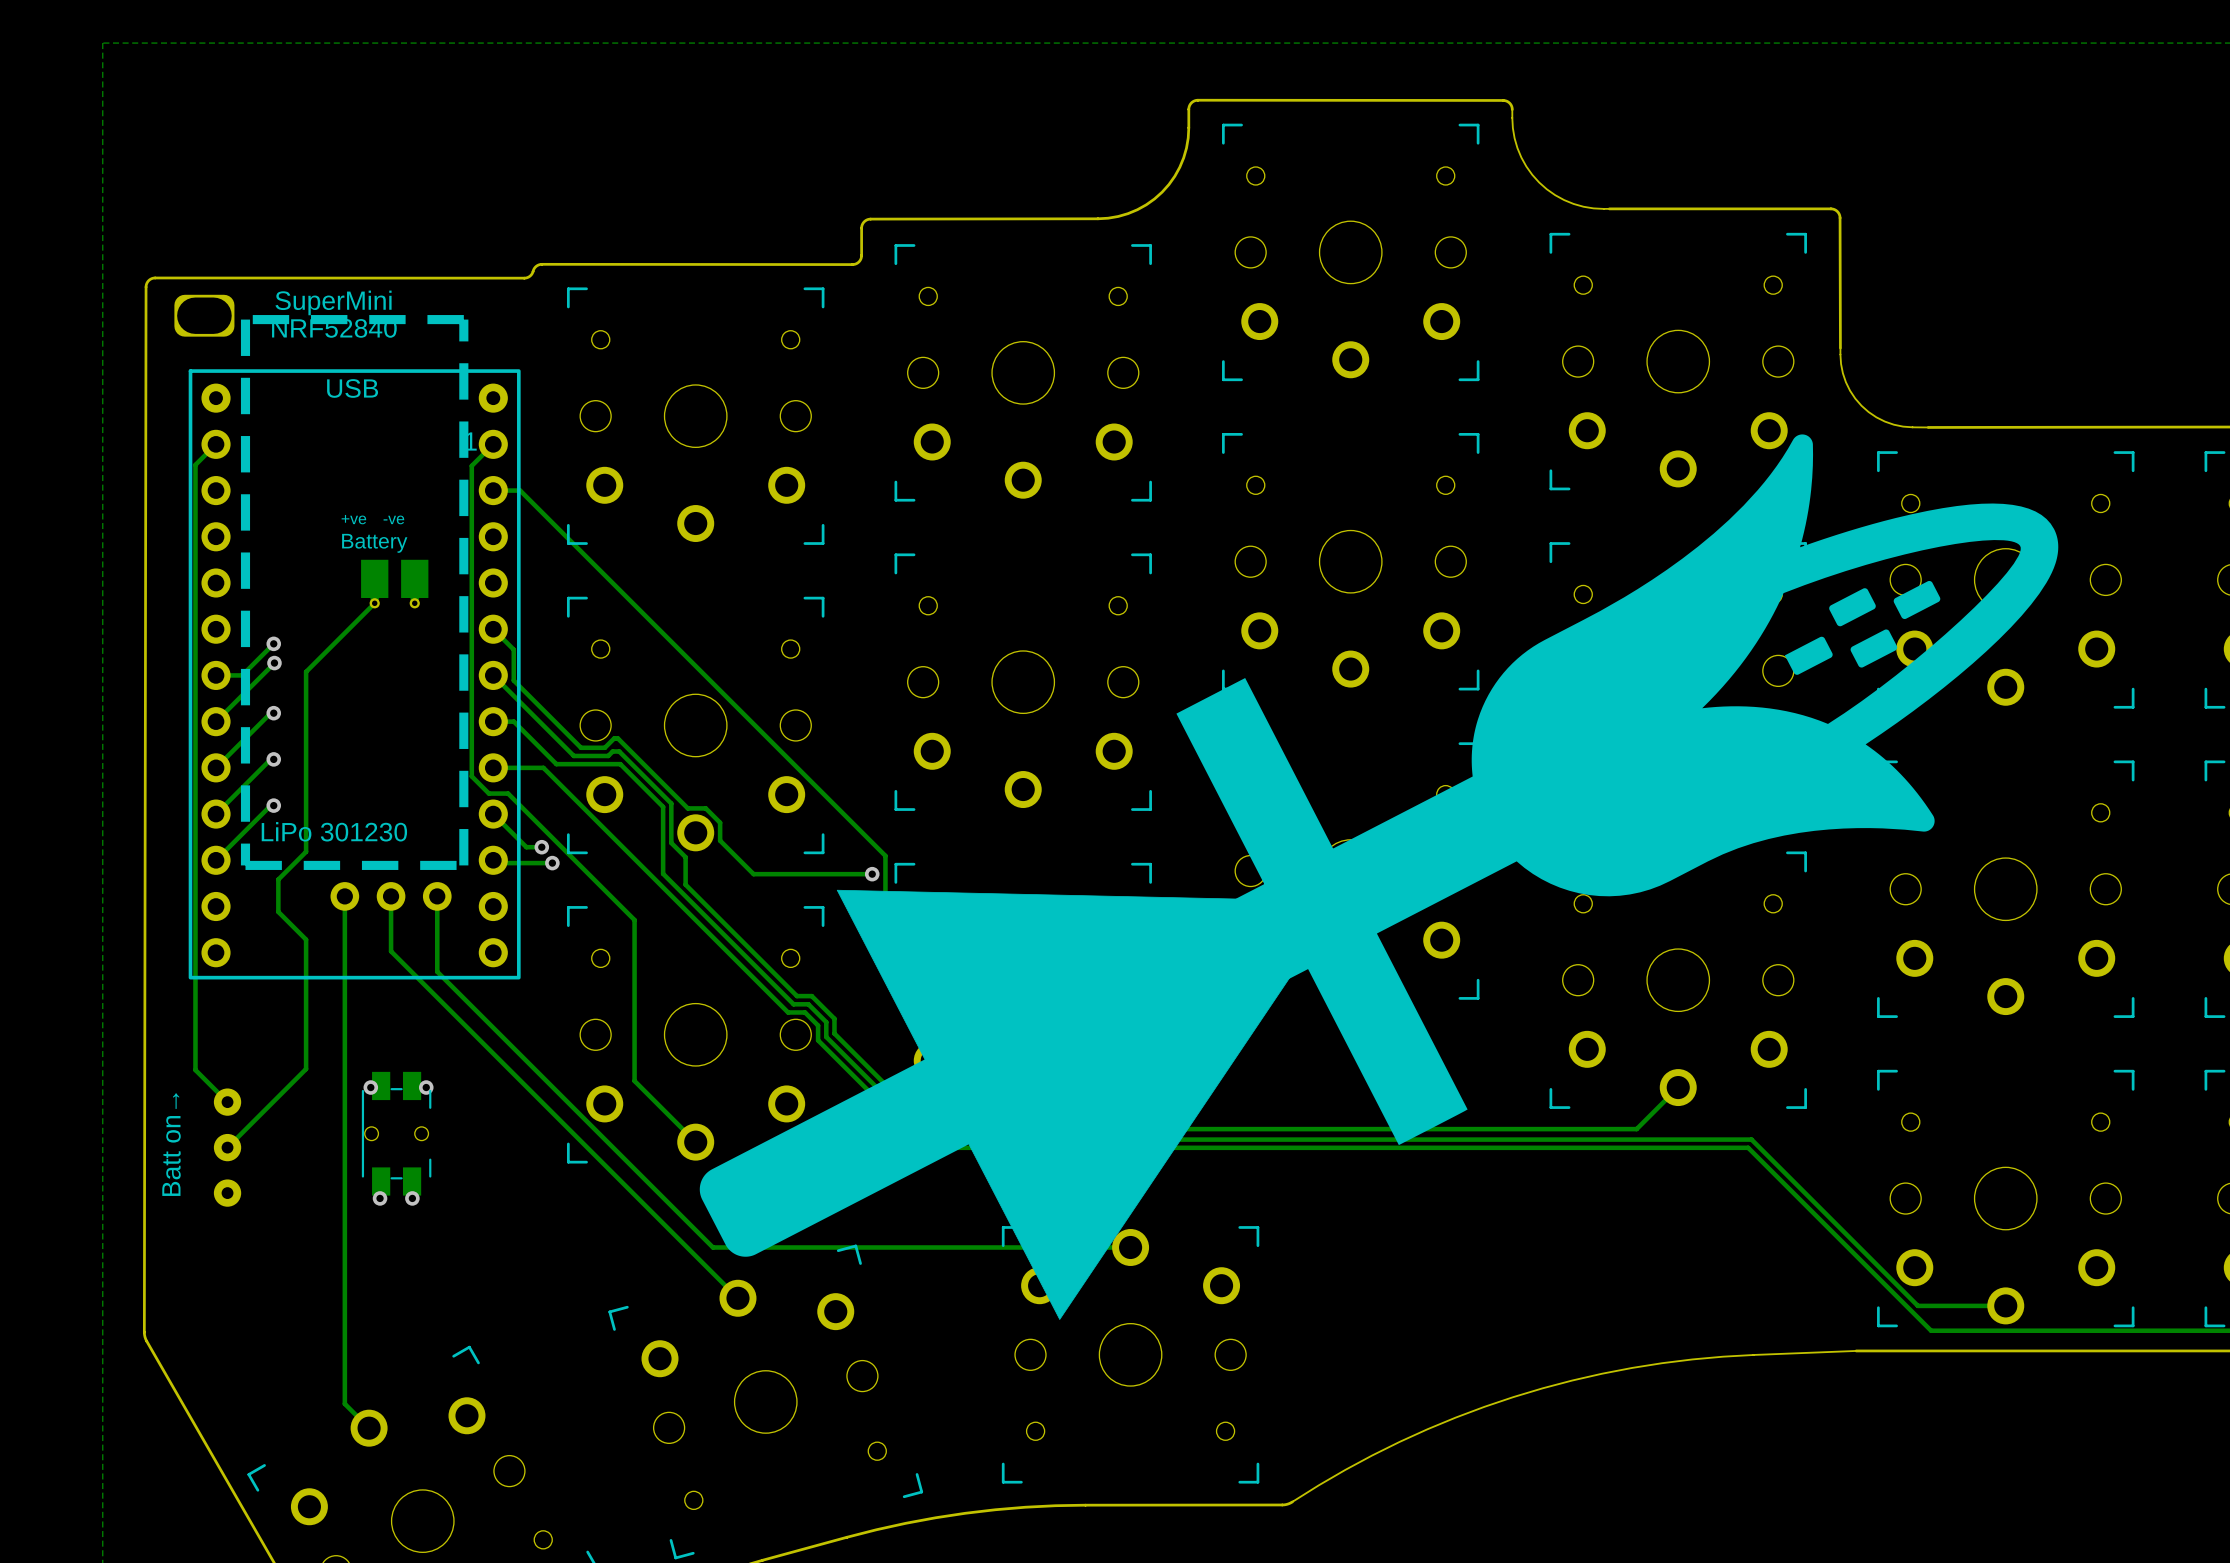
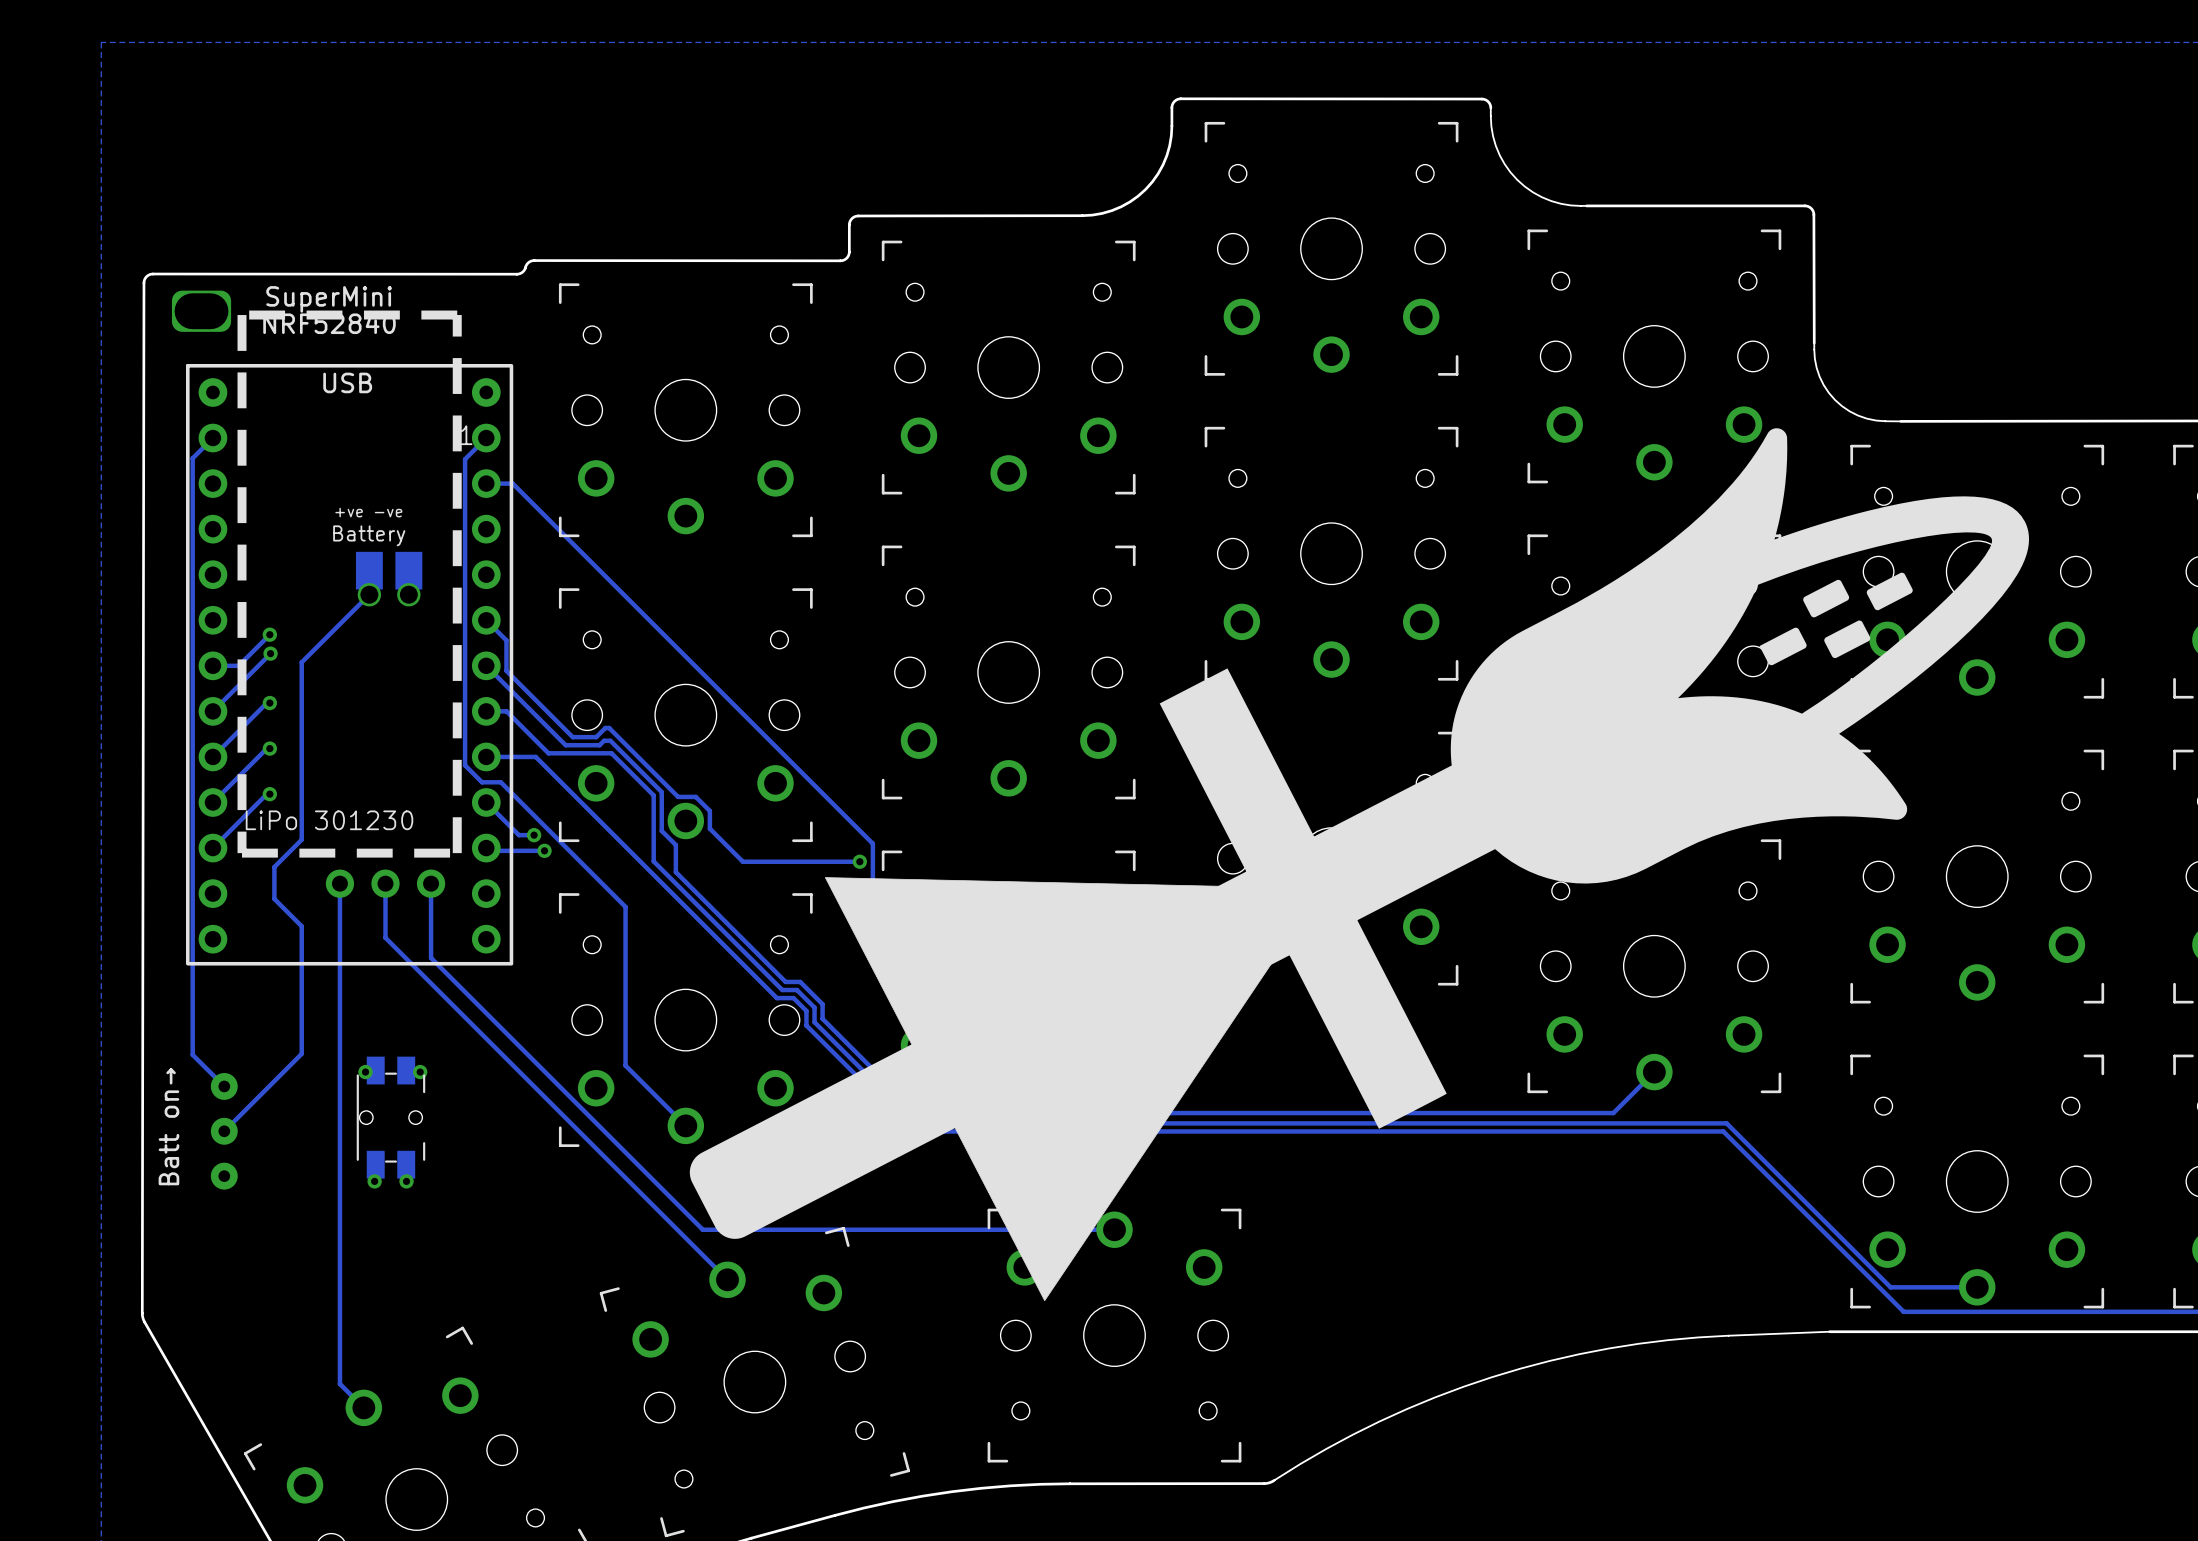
part footprint: [361, 559, 429, 609] -> [355, 551, 423, 607]

